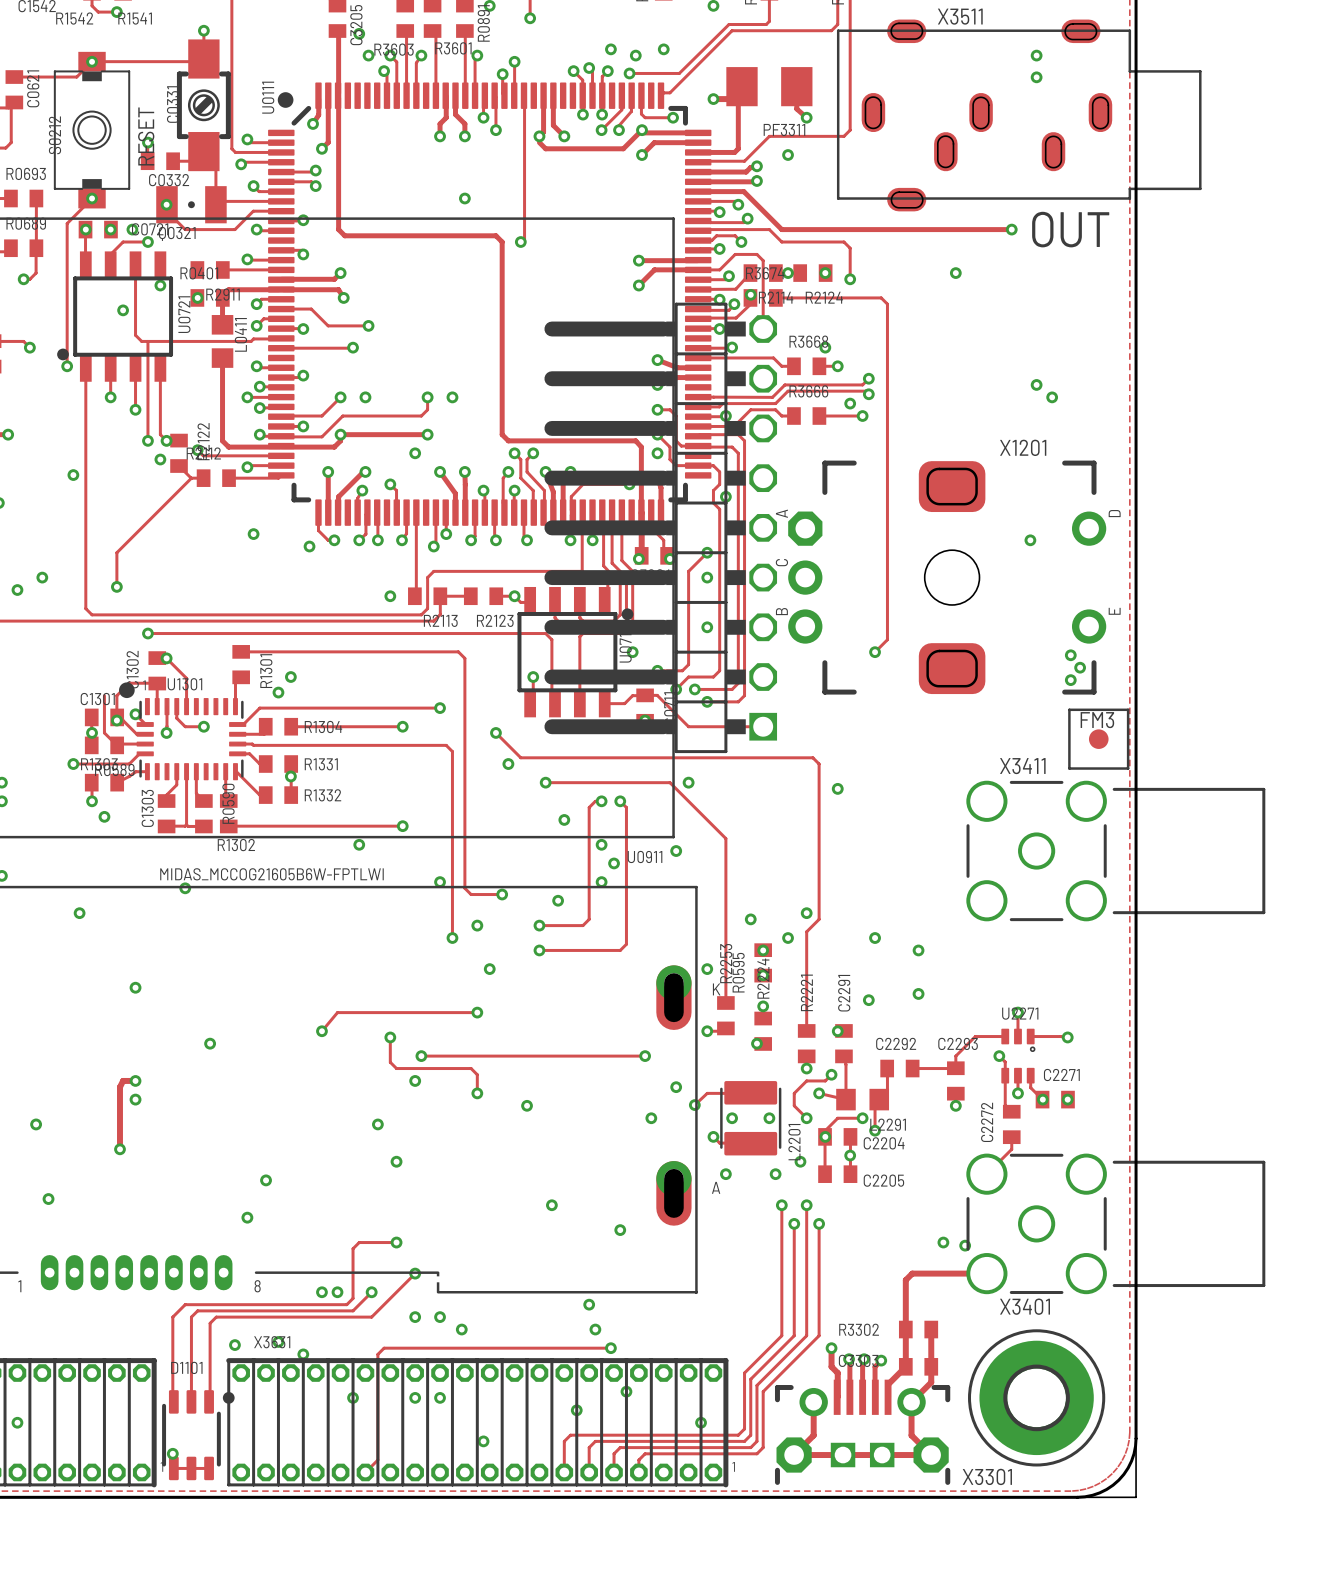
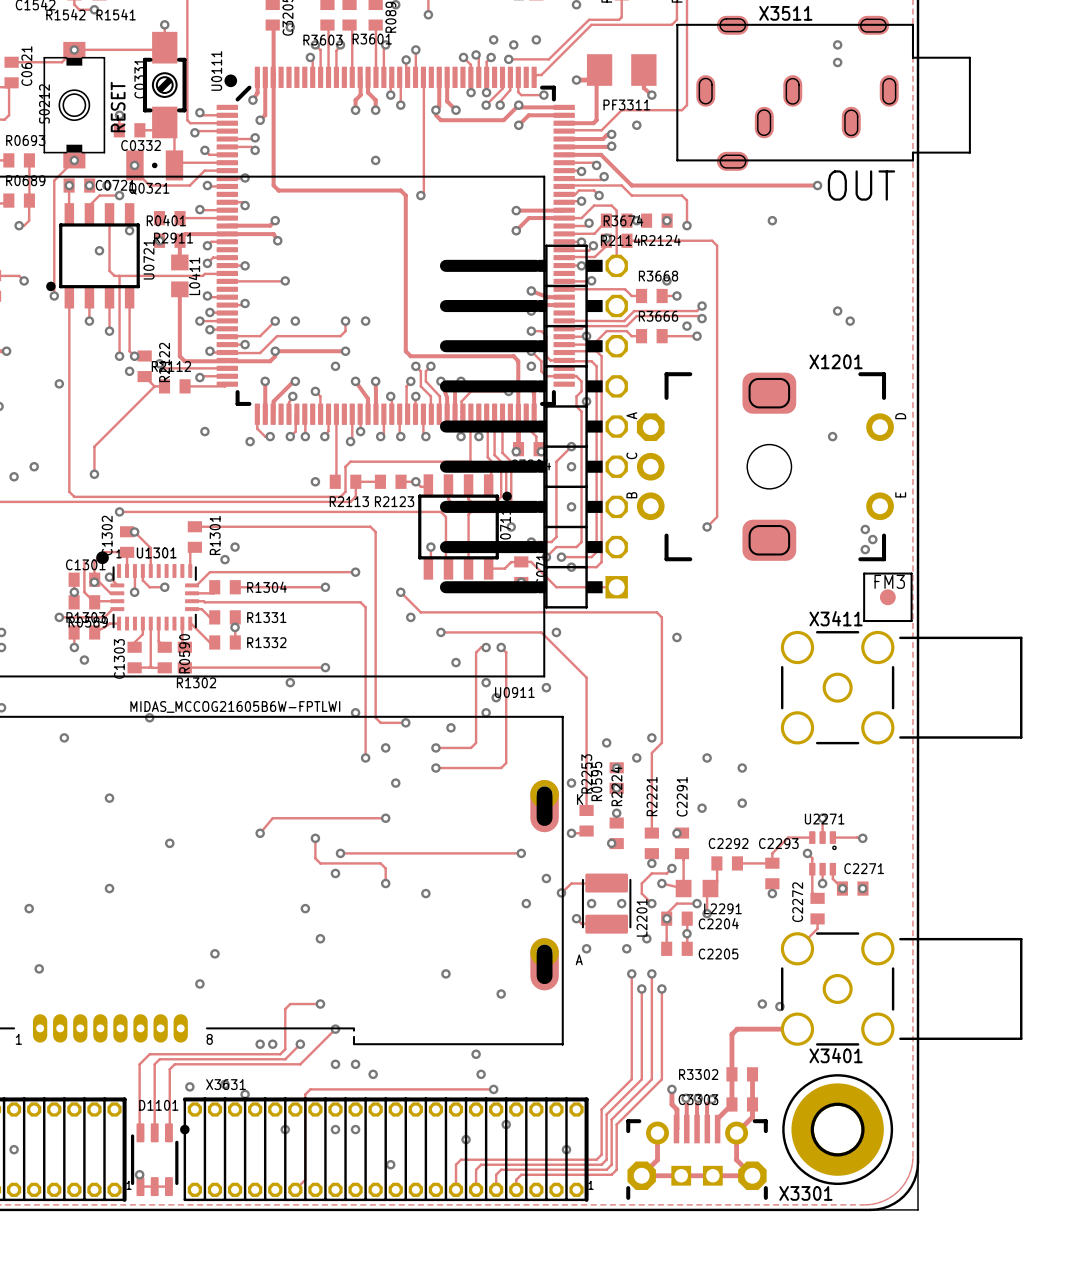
via: (368, 55) -> none
track: (281, 309) (311, 309) (328, 325) (368, 325) -> none
via: (368, 325) -> none
track: (135, 1080) (123, 1080) (119, 1087) (119, 1149) -> none
via: (135, 1080) -> none
via: (119, 1149) -> none

